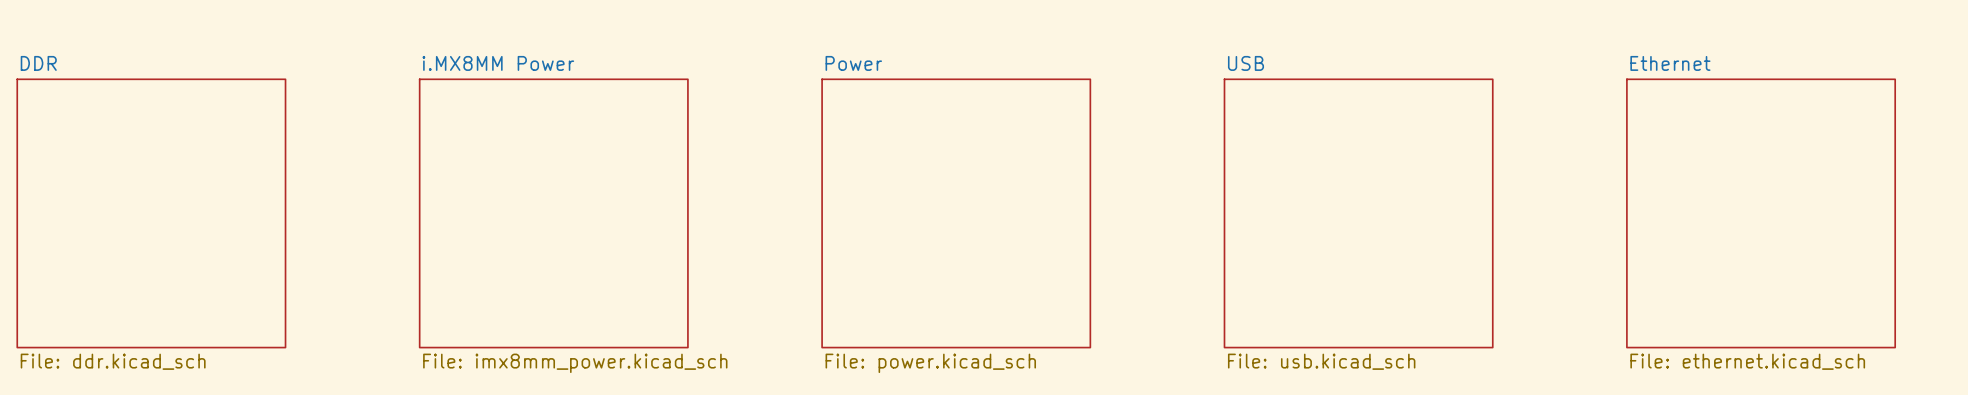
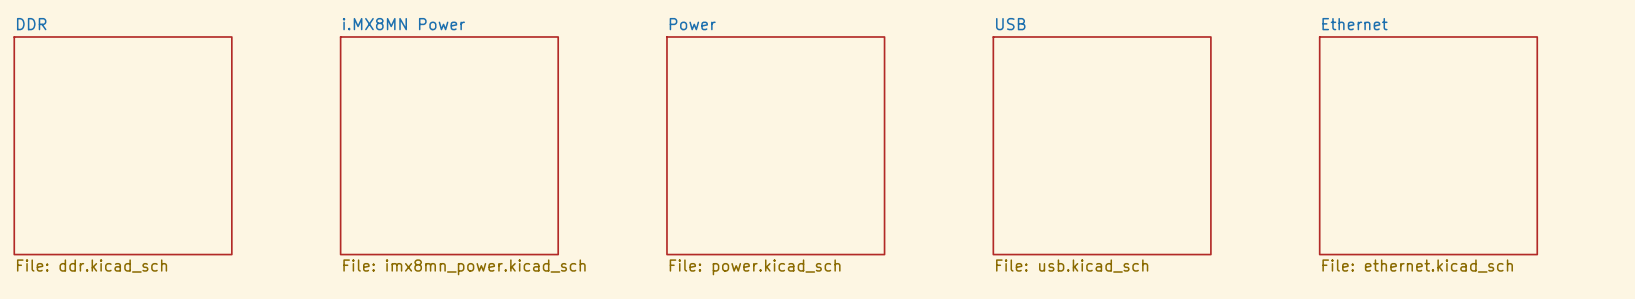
sheet i.MX8MM Power name: i.MX8MM Power (498, 63) -> i.MX8MN Power (403, 24)
sheet i.MX8MM Power value: File: imx8mm_power.kicad_sch (575, 363) -> File: imx8mn_power.kicad_sch (464, 267)

